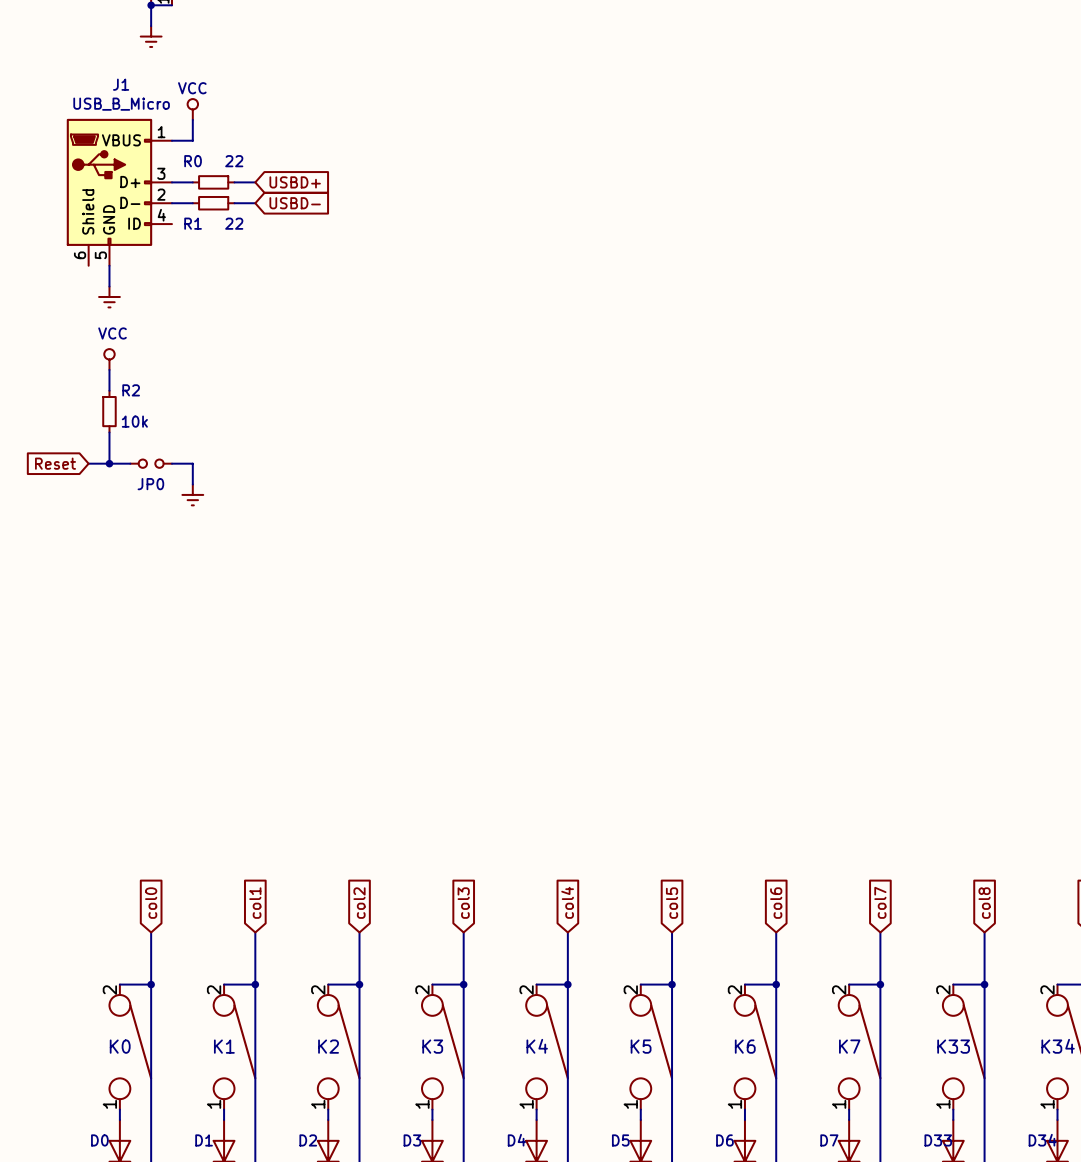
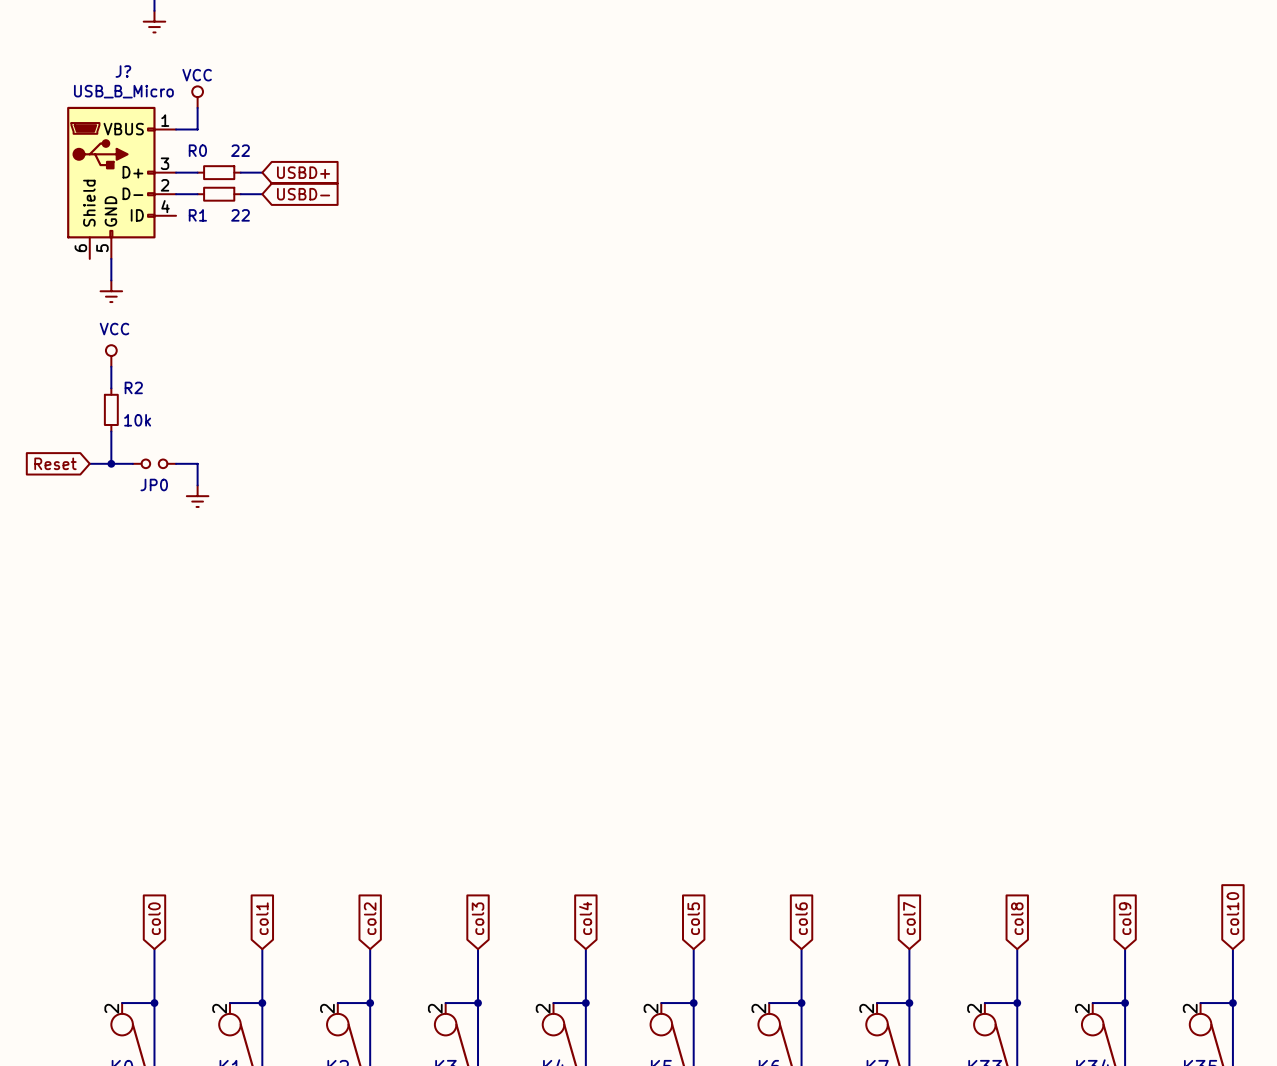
J1 name: J1 (121, 84) -> J? (123, 71)

